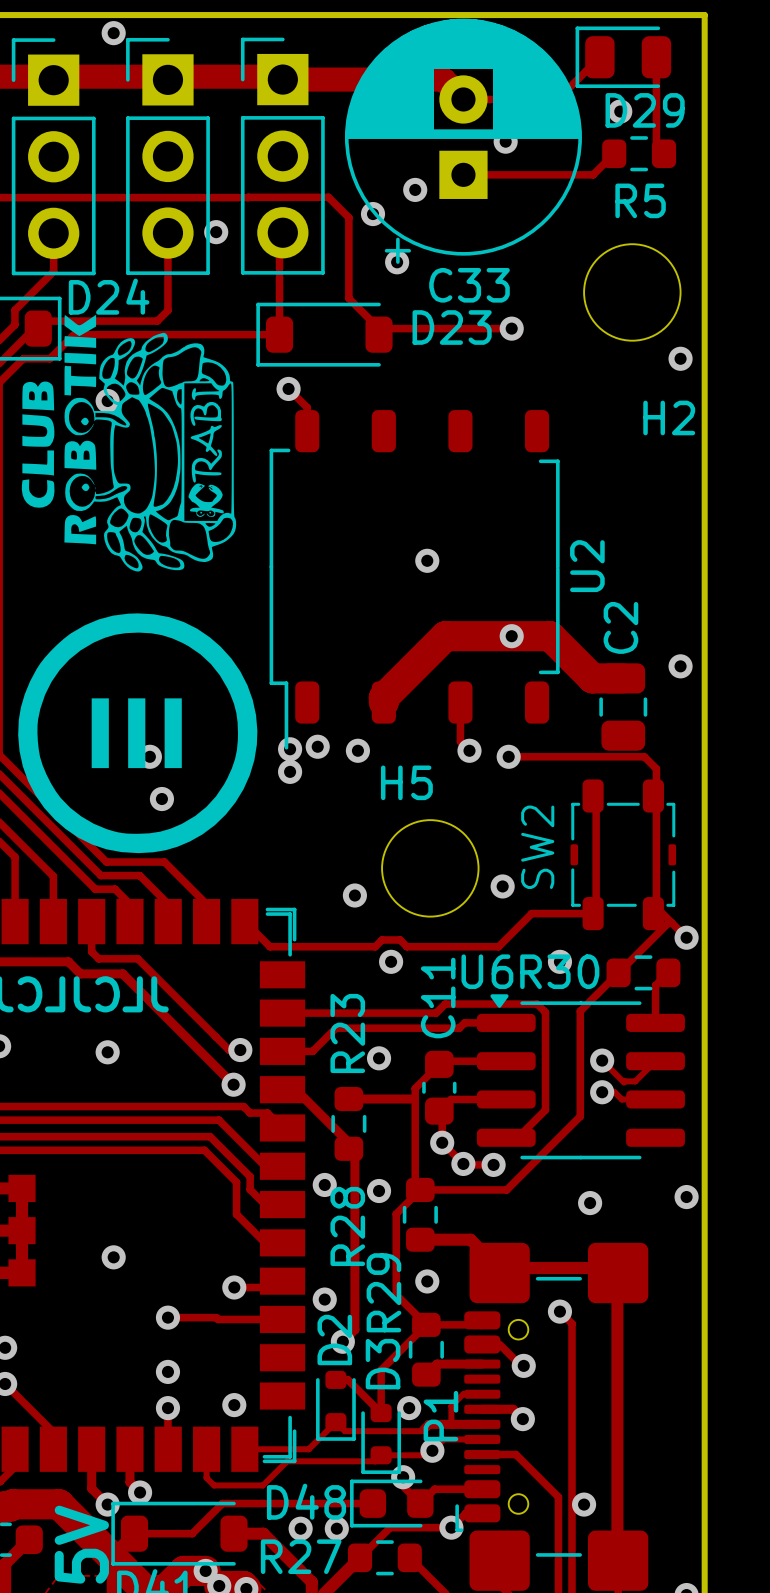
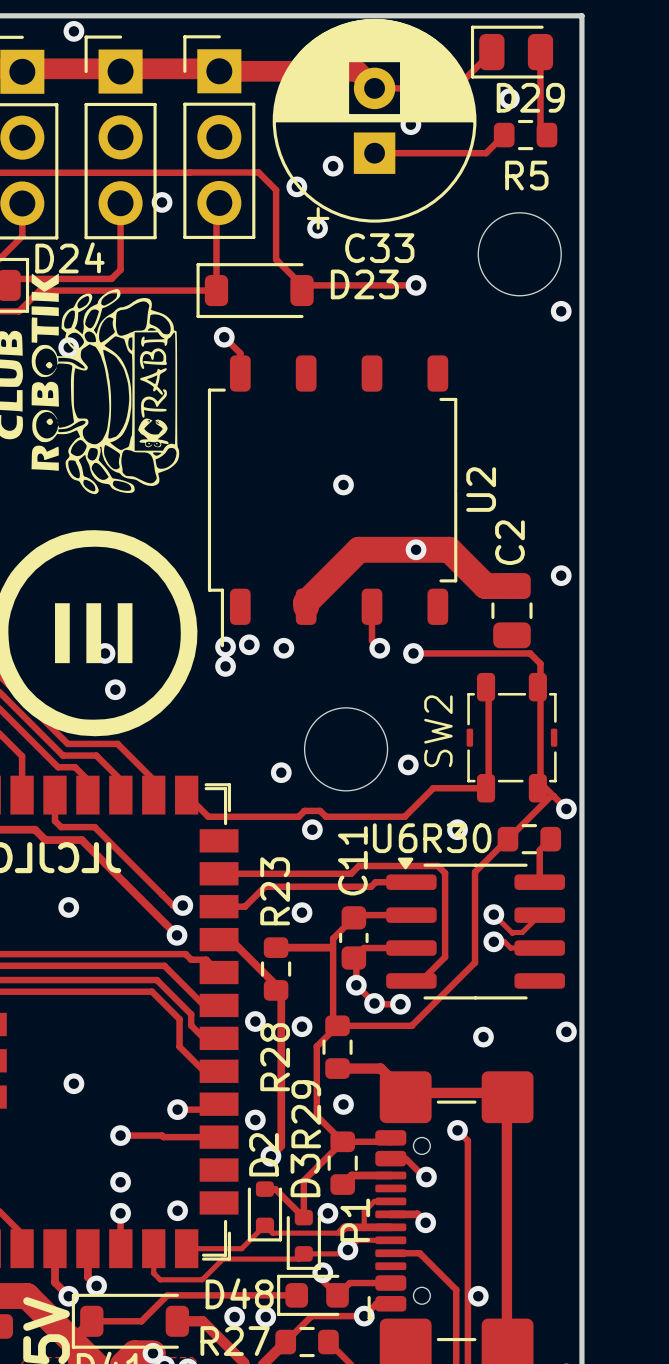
H2 name: H2 (669, 417) -> none
H5 name: H5 (406, 782) -> none

